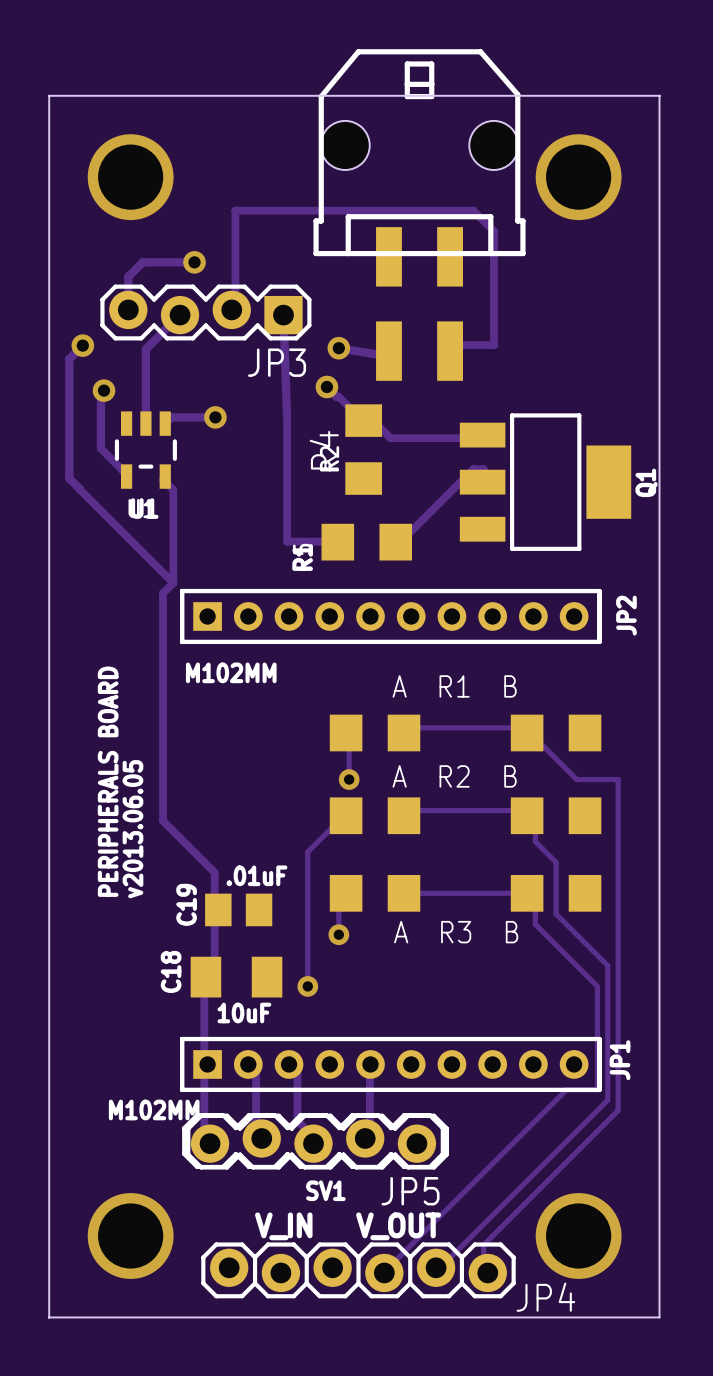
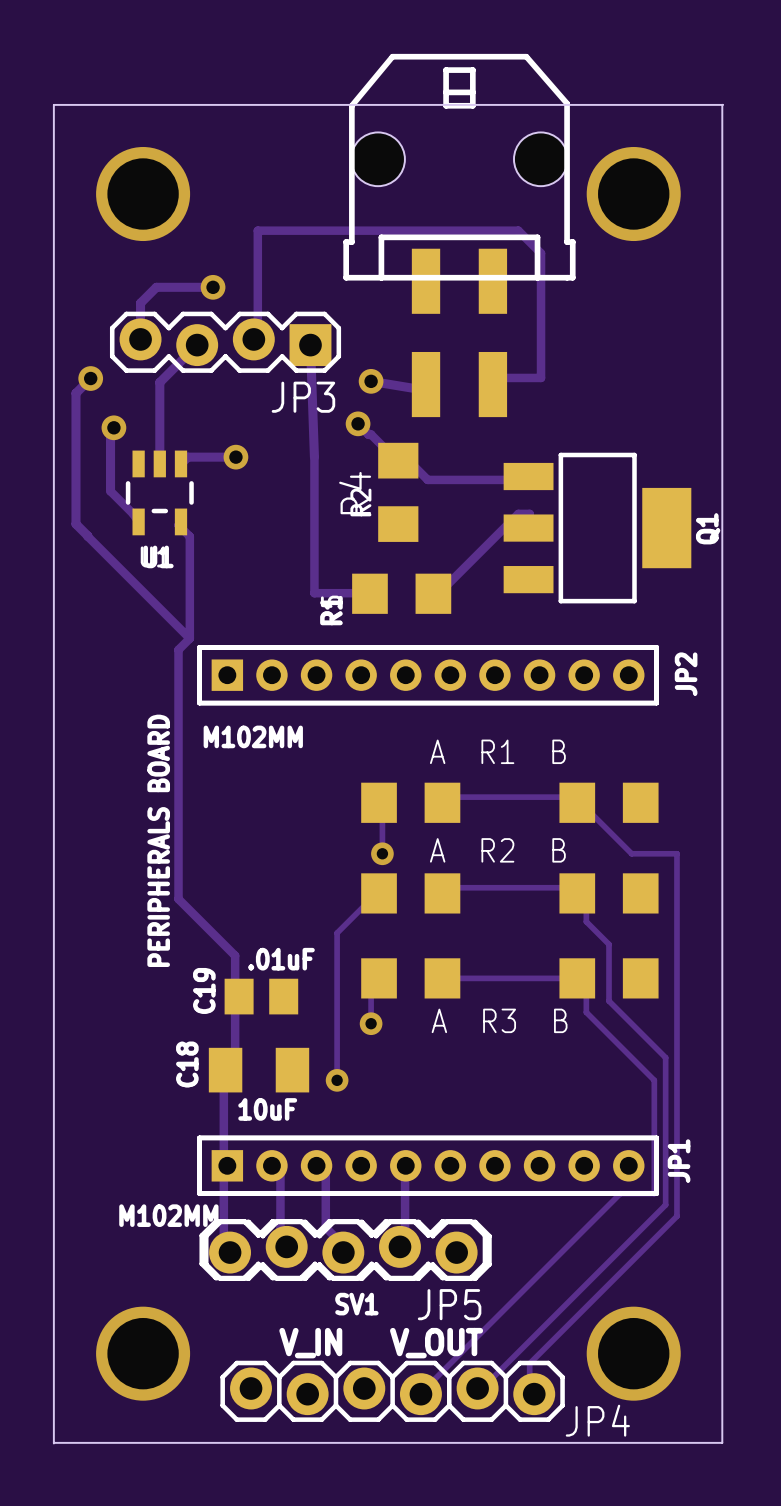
text position: PERIPHERALS BOARD (108, 781) -> PERIPHERALS BOARD (158, 840)
text: v2013.06.05 (132, 829) -> none

